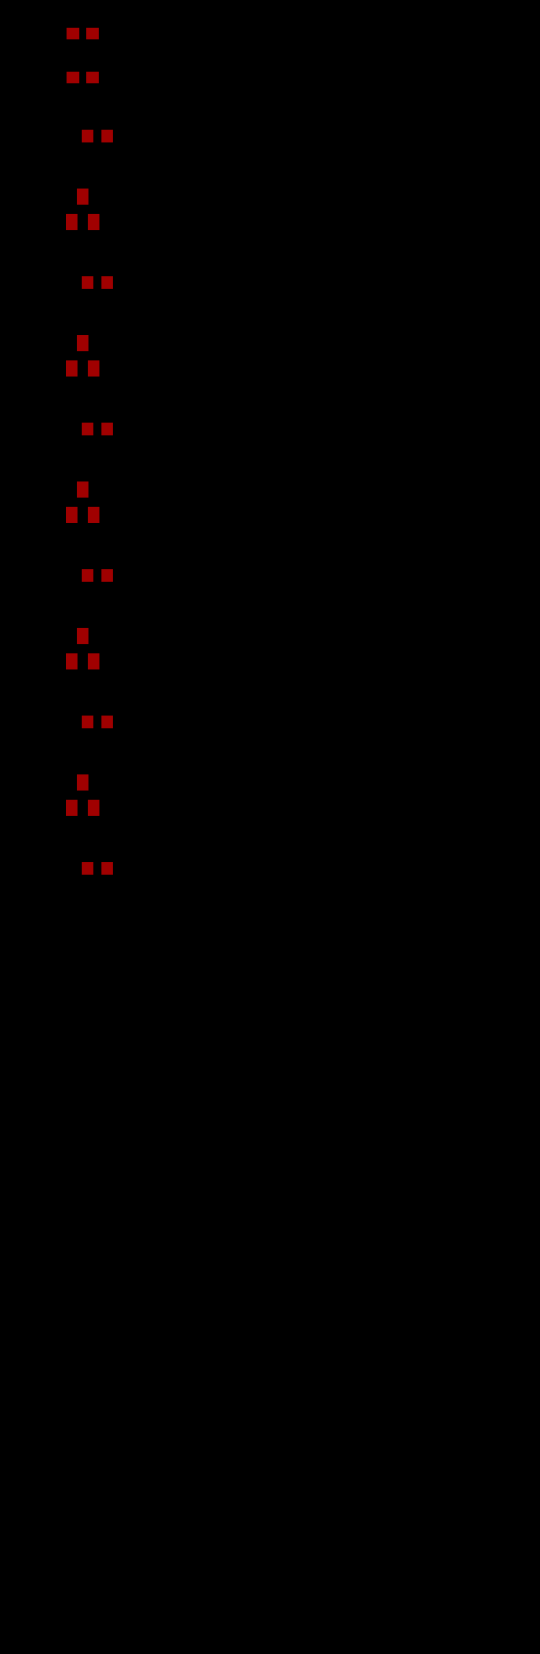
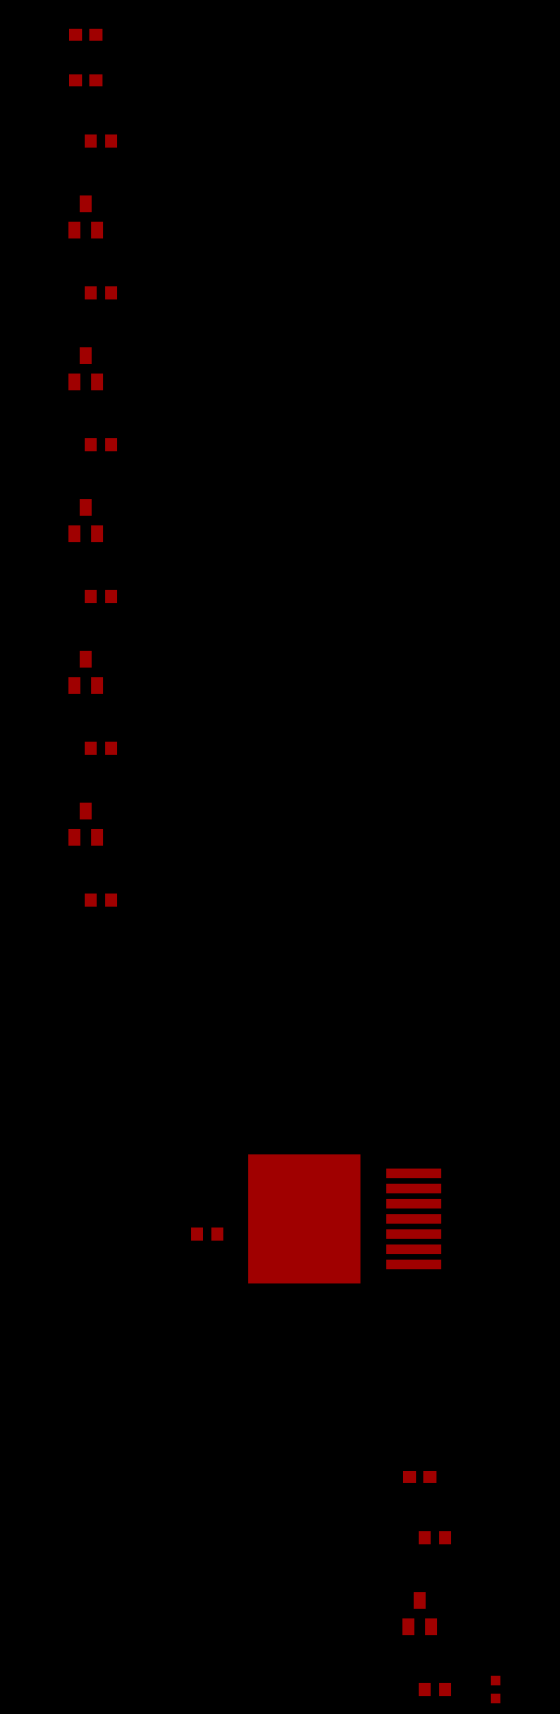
part: none -> (344, 1218)
part: none -> (207, 1234)
part: none -> (419, 1476)
part: none -> (434, 1537)
part: none -> (419, 1613)
part: none -> (434, 1689)
part: none -> (495, 1689)

